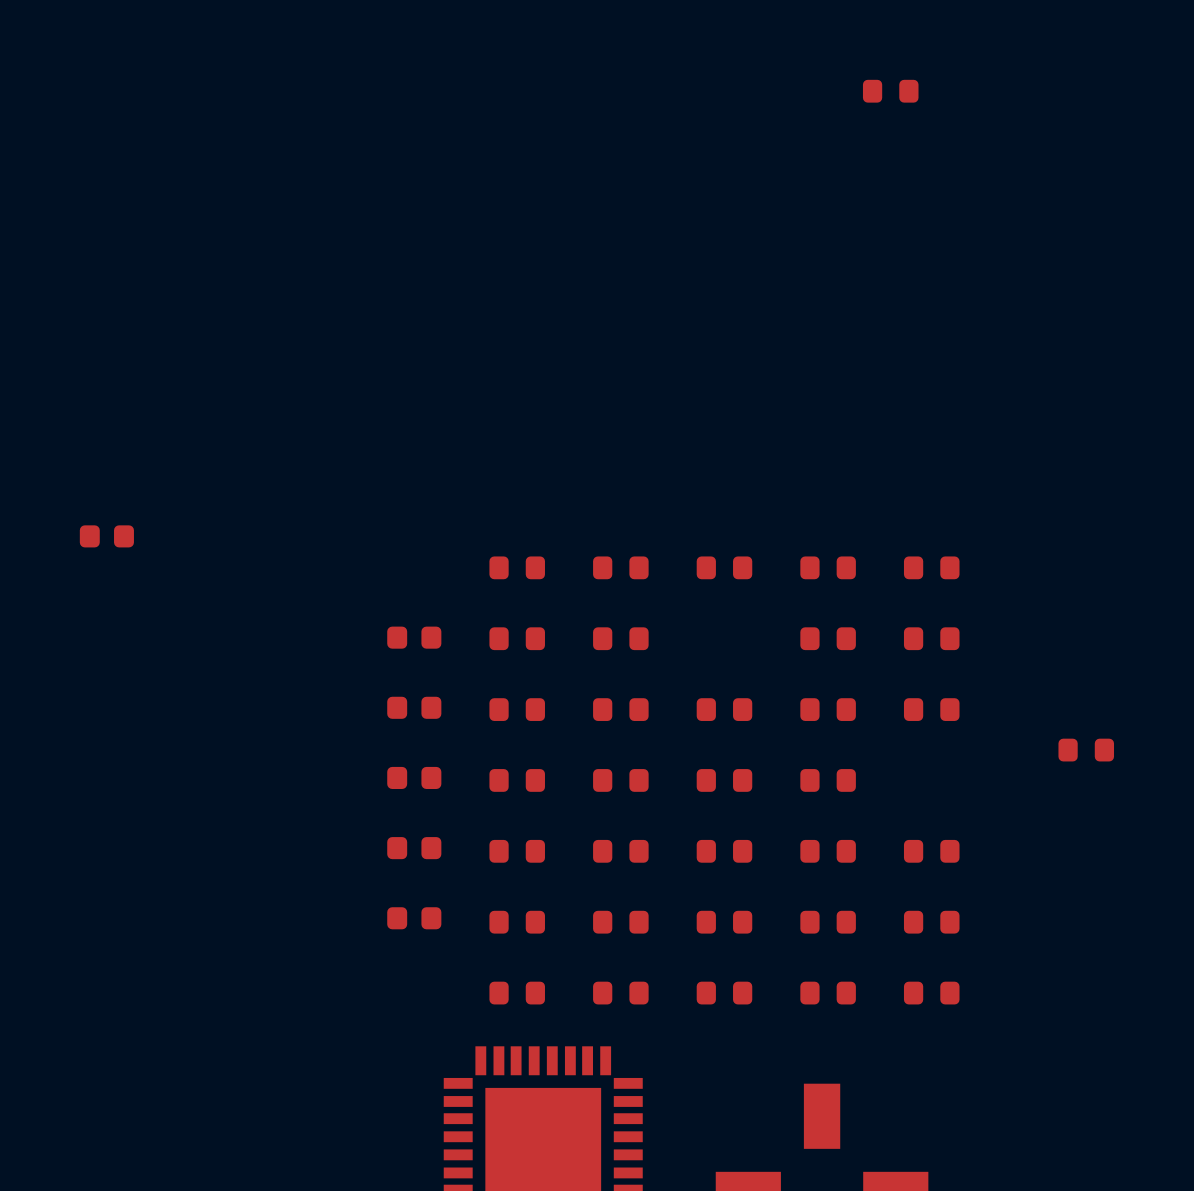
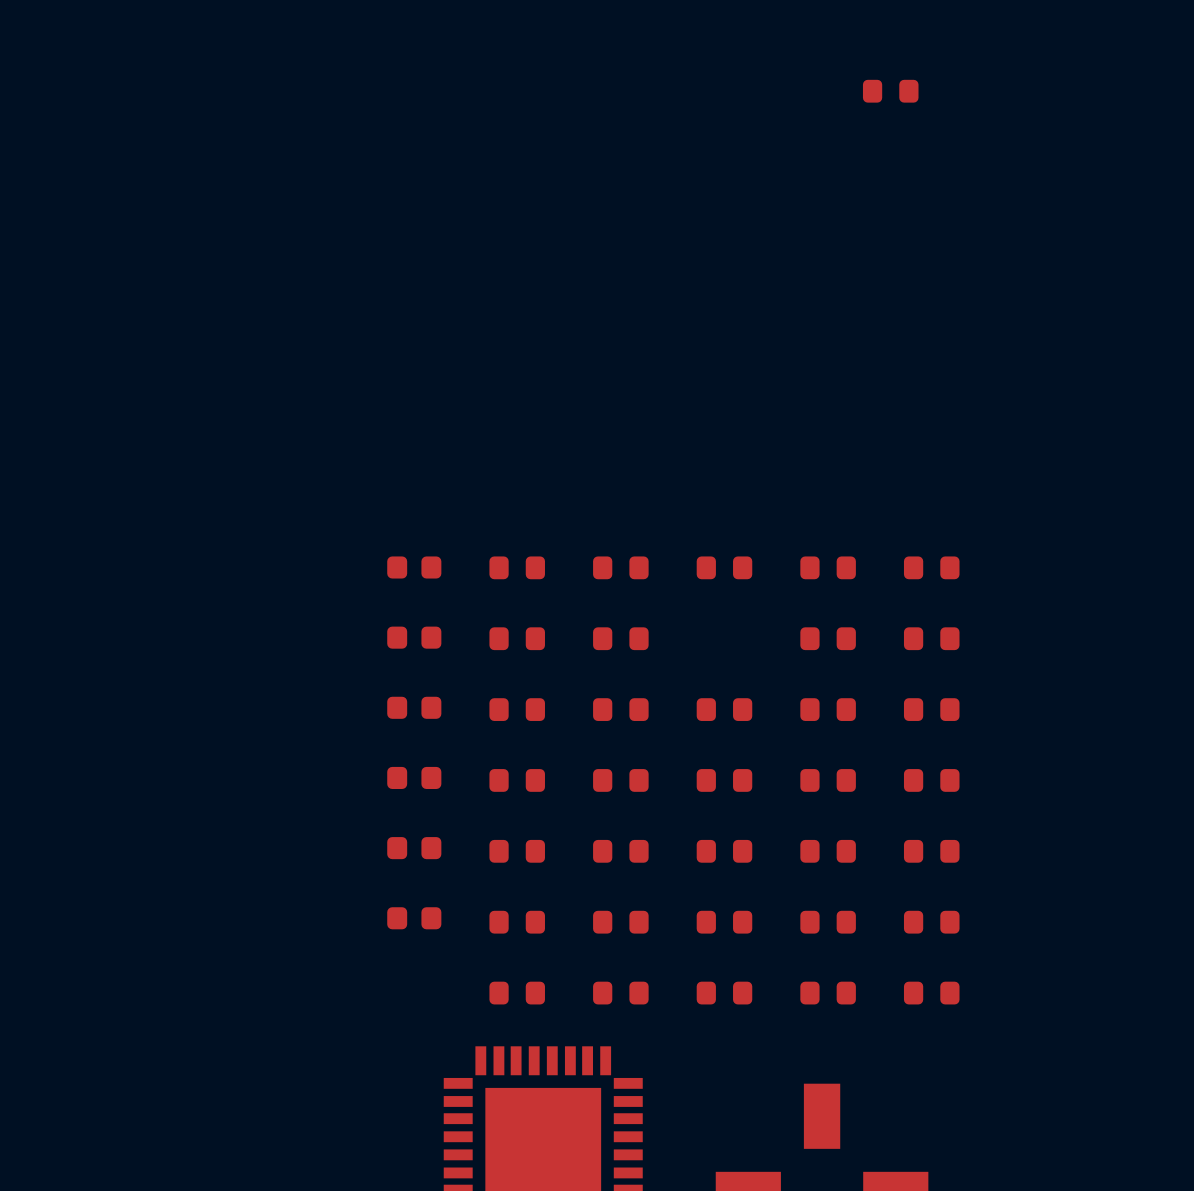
part position: (106, 536) -> (414, 567)
part position: (1086, 750) -> (931, 780)

